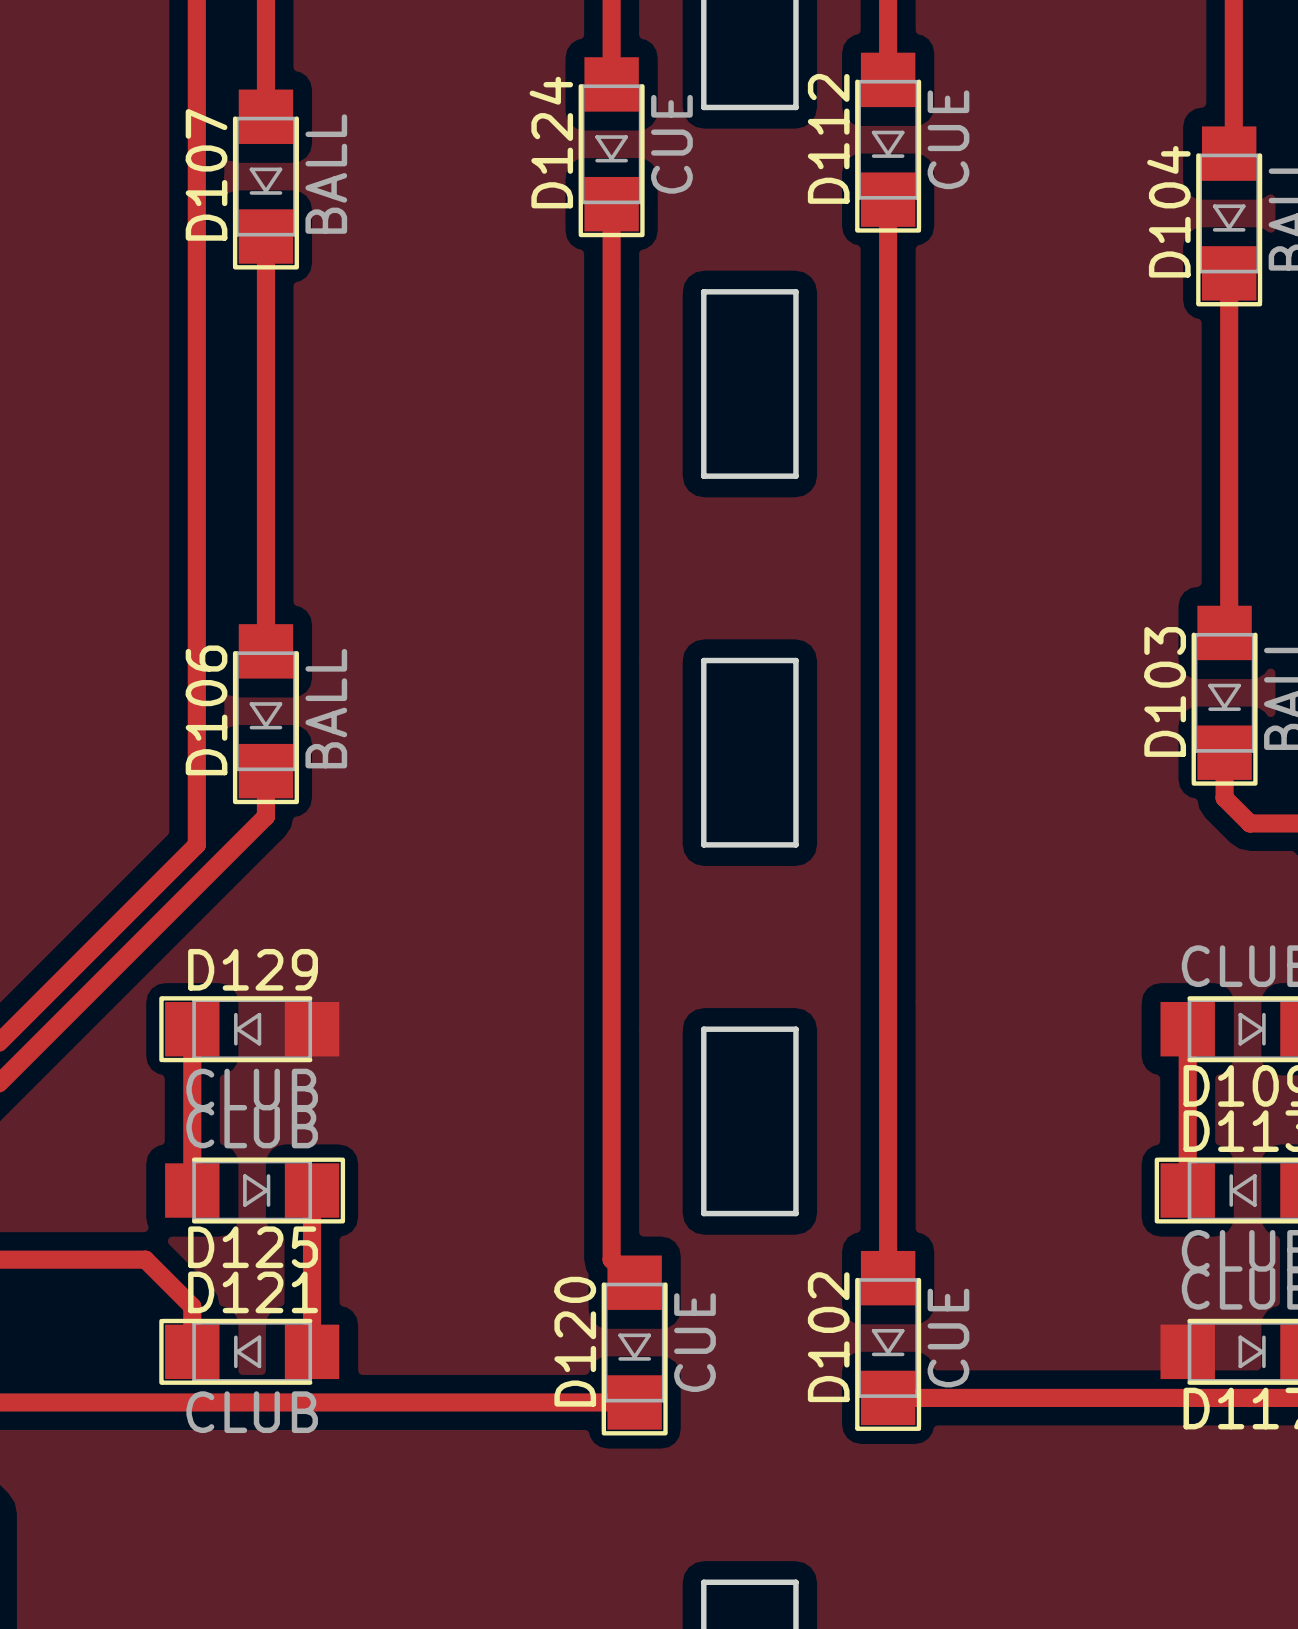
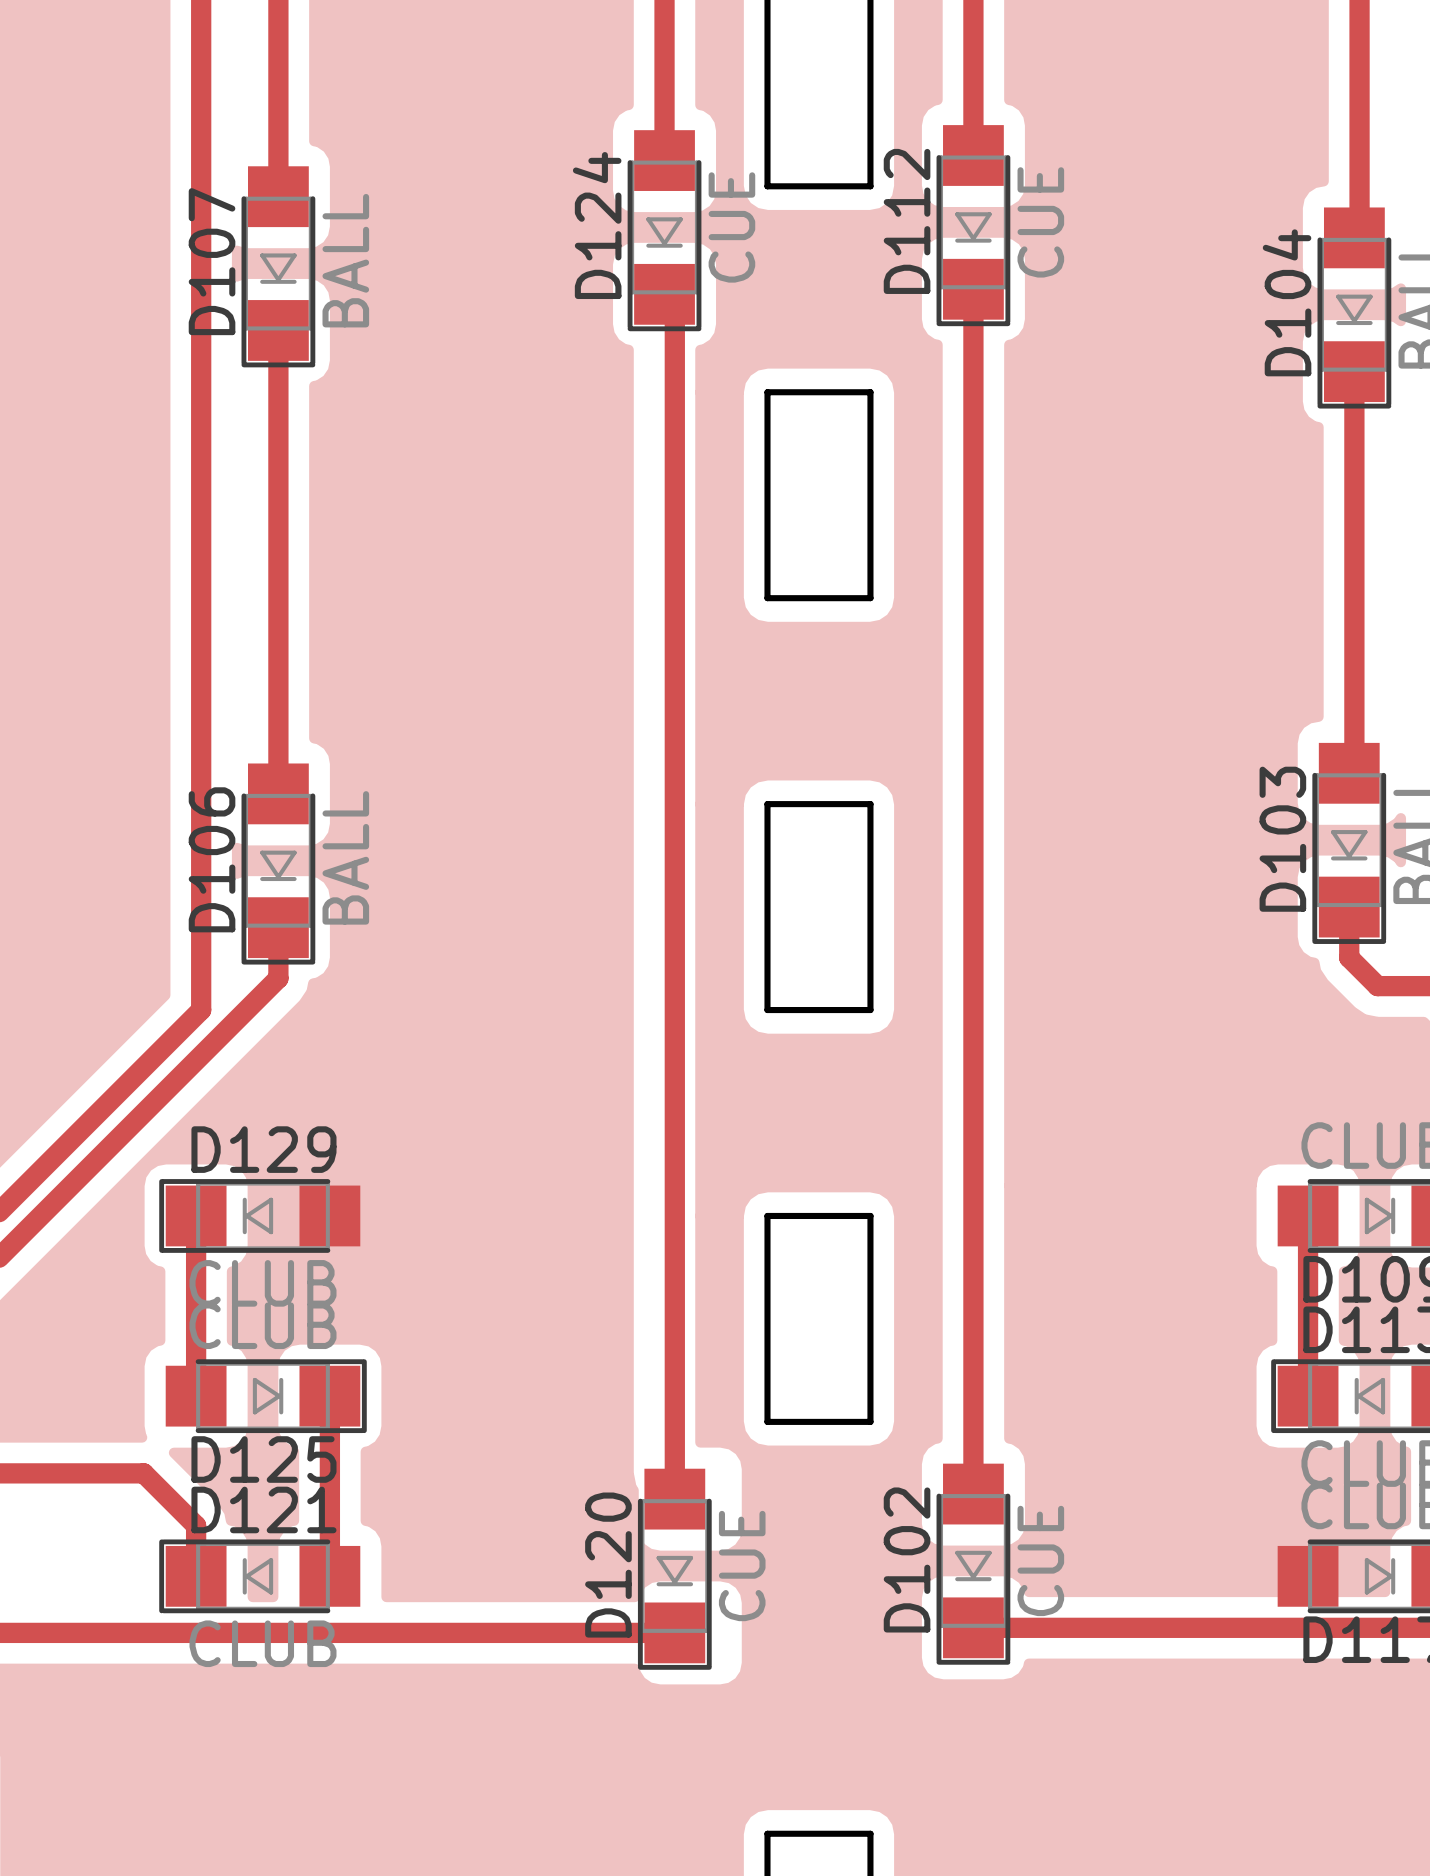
track: (611, 204) (611, 1259) (634, 1282) -> (664, 294) (674, 304) (674, 1499)
D120 position: (634, 1345) -> (674, 1569)

